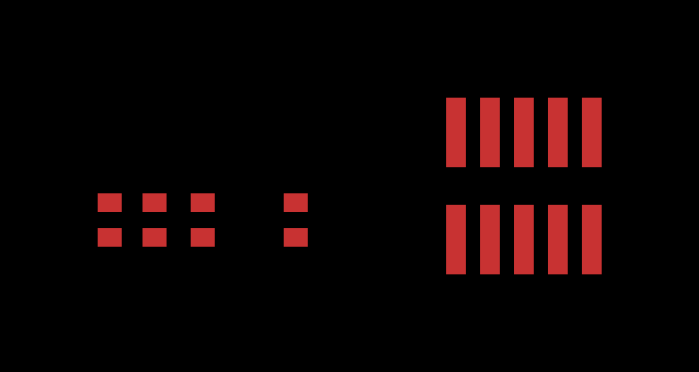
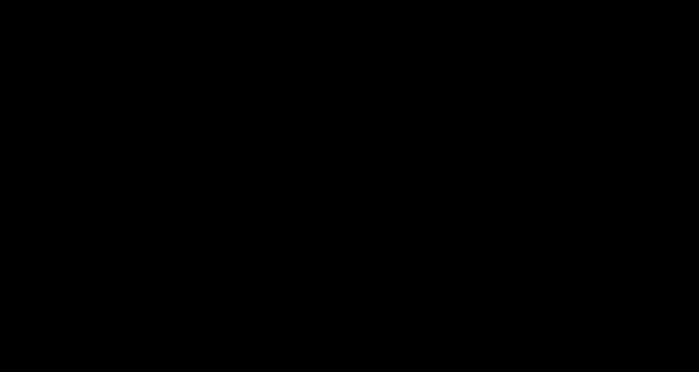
part: (523, 186) -> none
part: (109, 220) -> none
part: (154, 220) -> none
part: (202, 220) -> none
part: (295, 220) -> none

